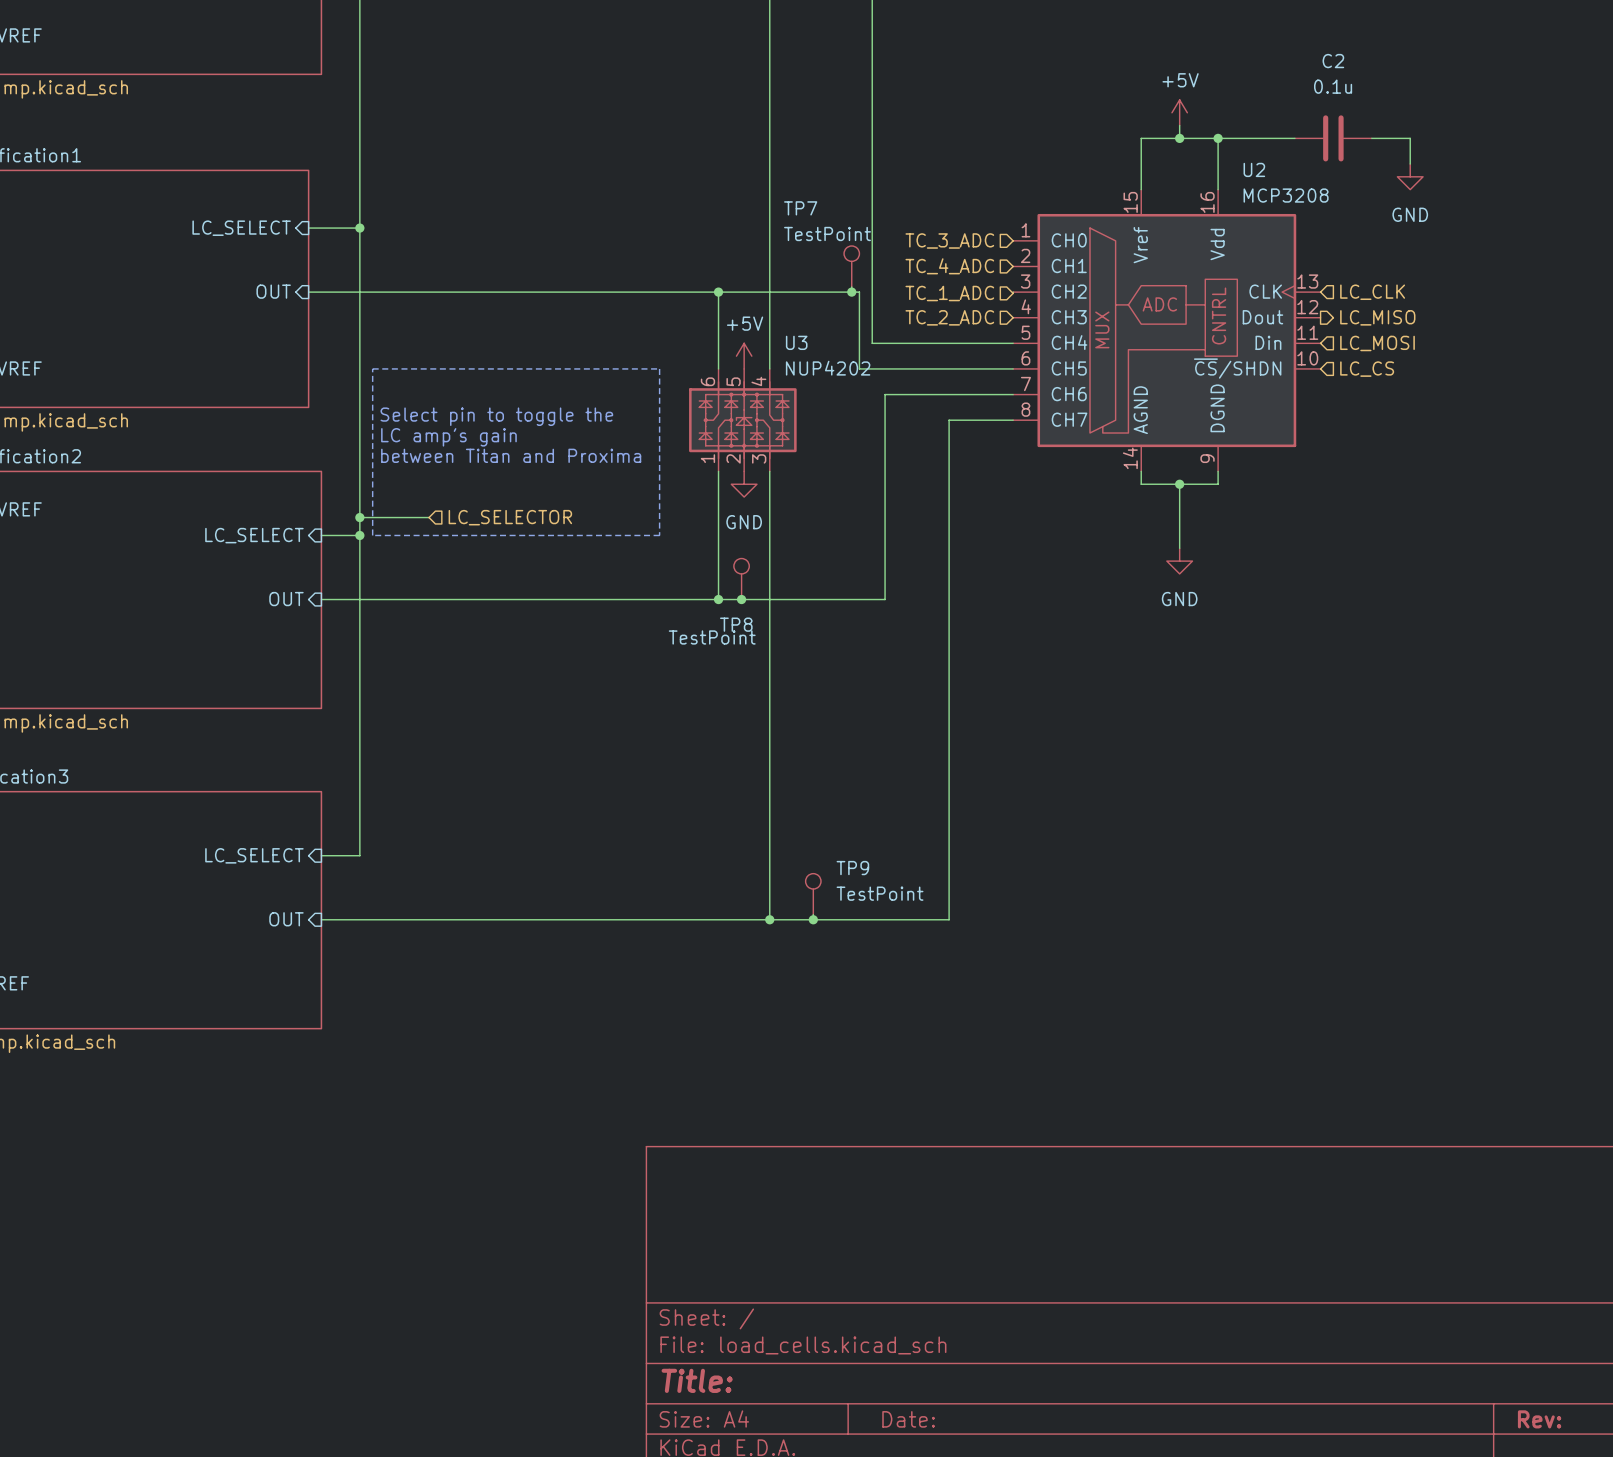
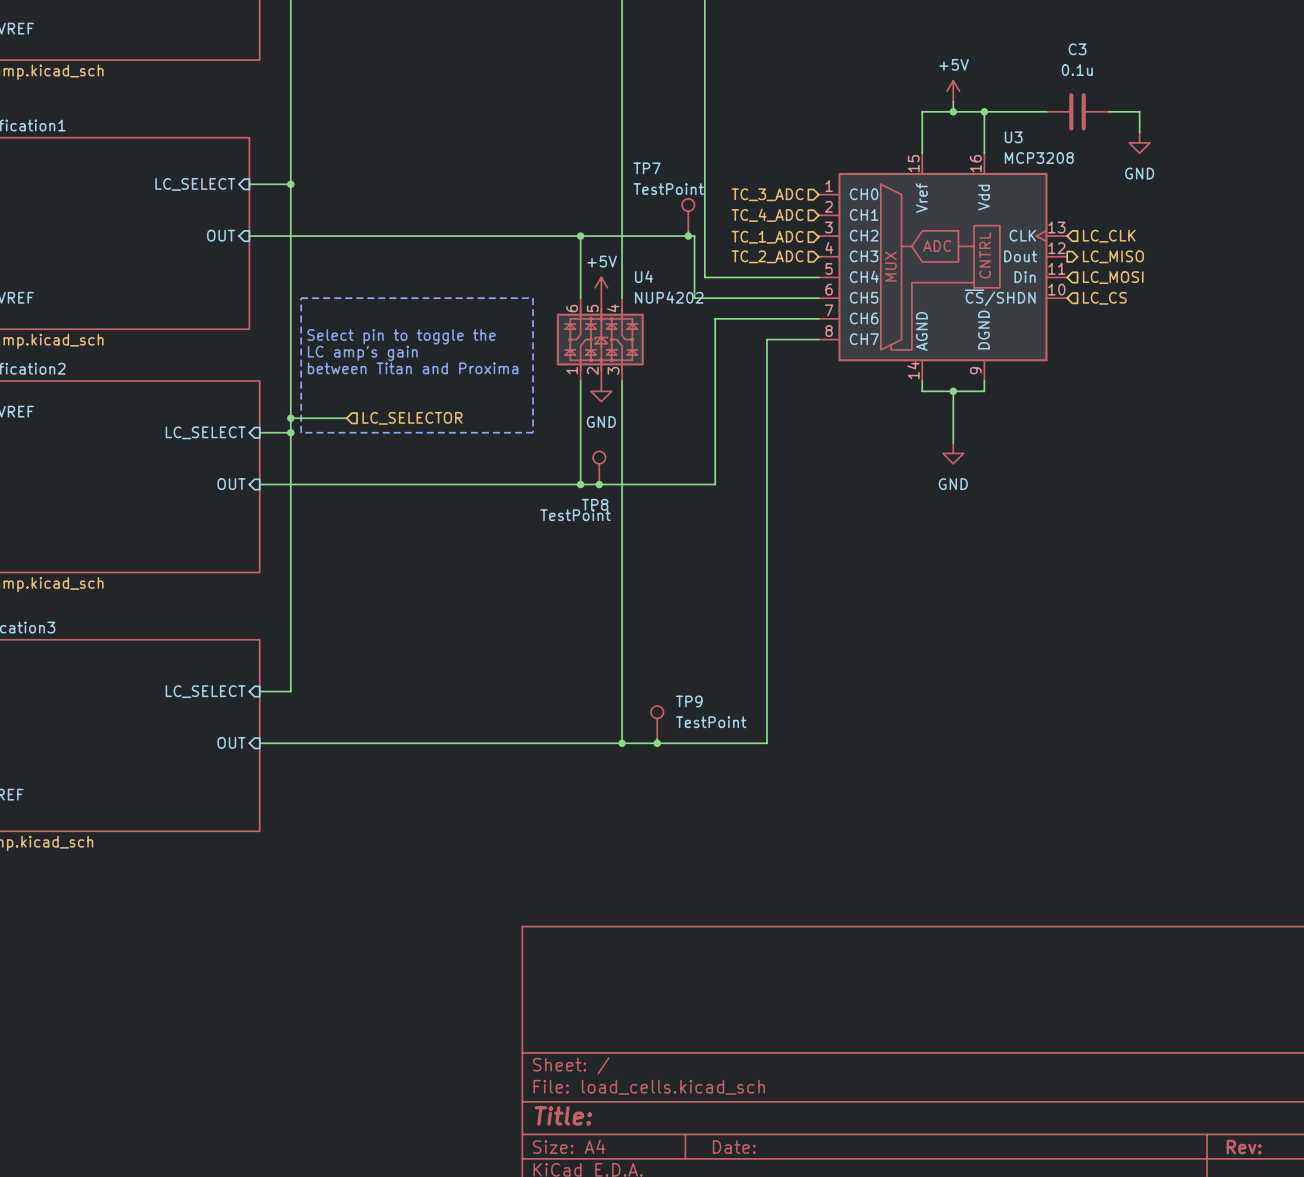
C2 name: C2 (1333, 61) -> C3 (1077, 49)
U2 name: U2 (1254, 169) -> U3 (1013, 137)
U3 name: U3 (796, 342) -> U4 (644, 276)

